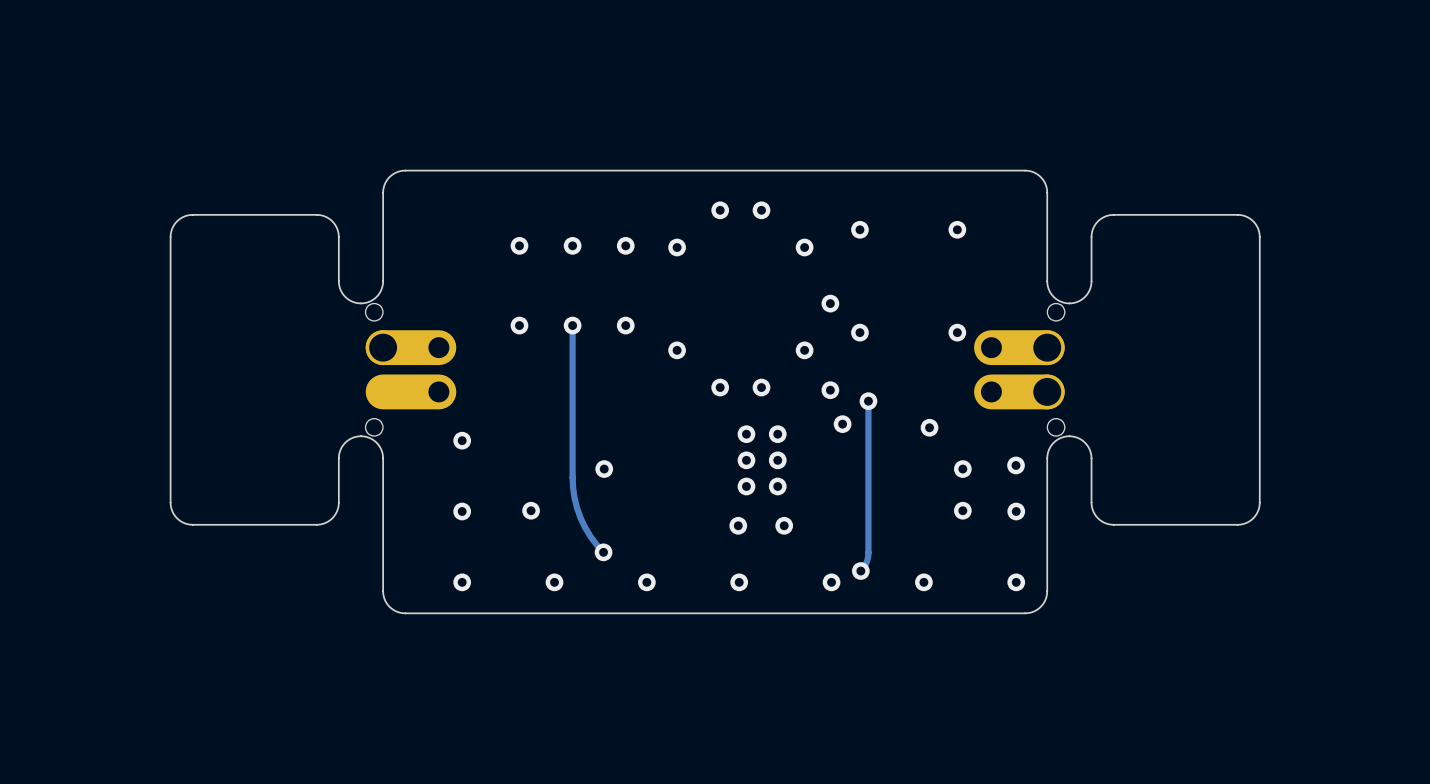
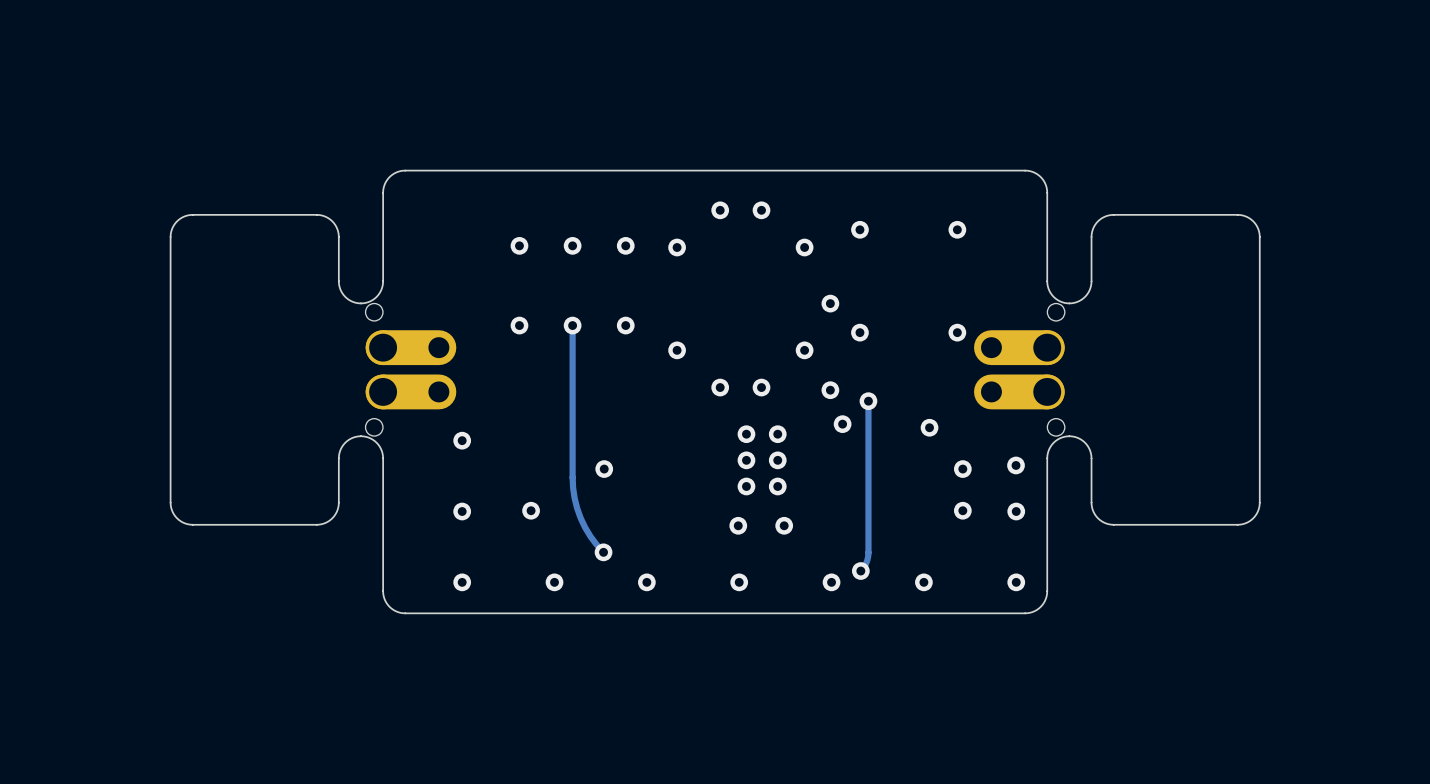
part footprint: [365, 374, 457, 410] -> [365, 374, 457, 410]

